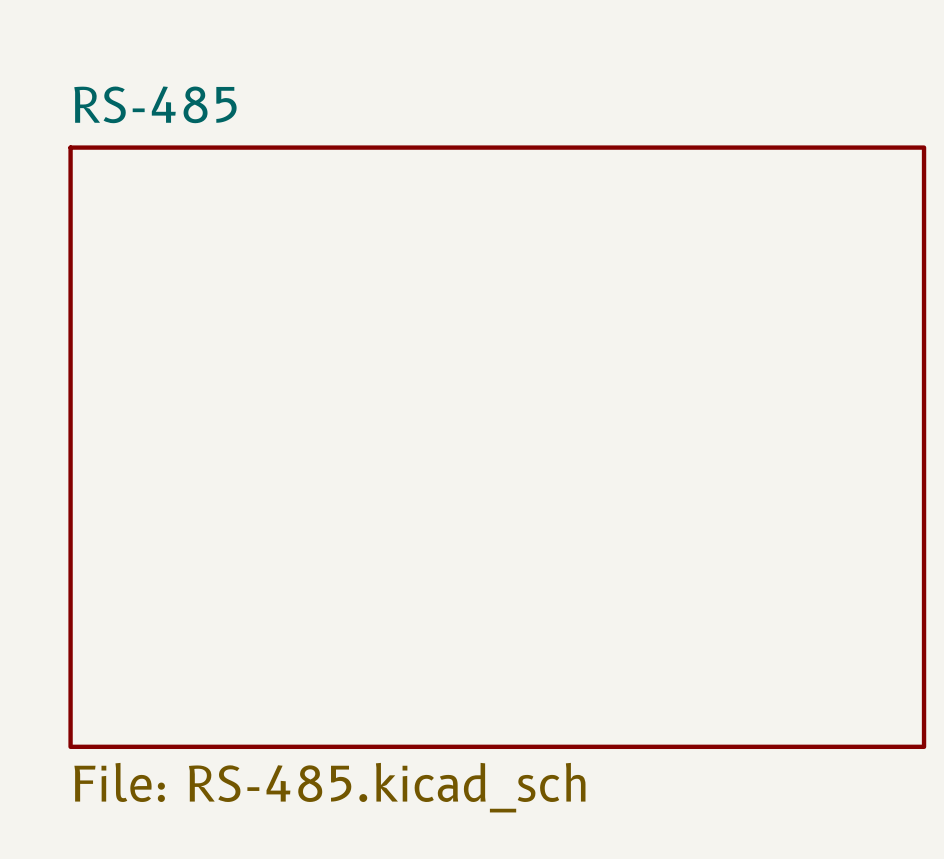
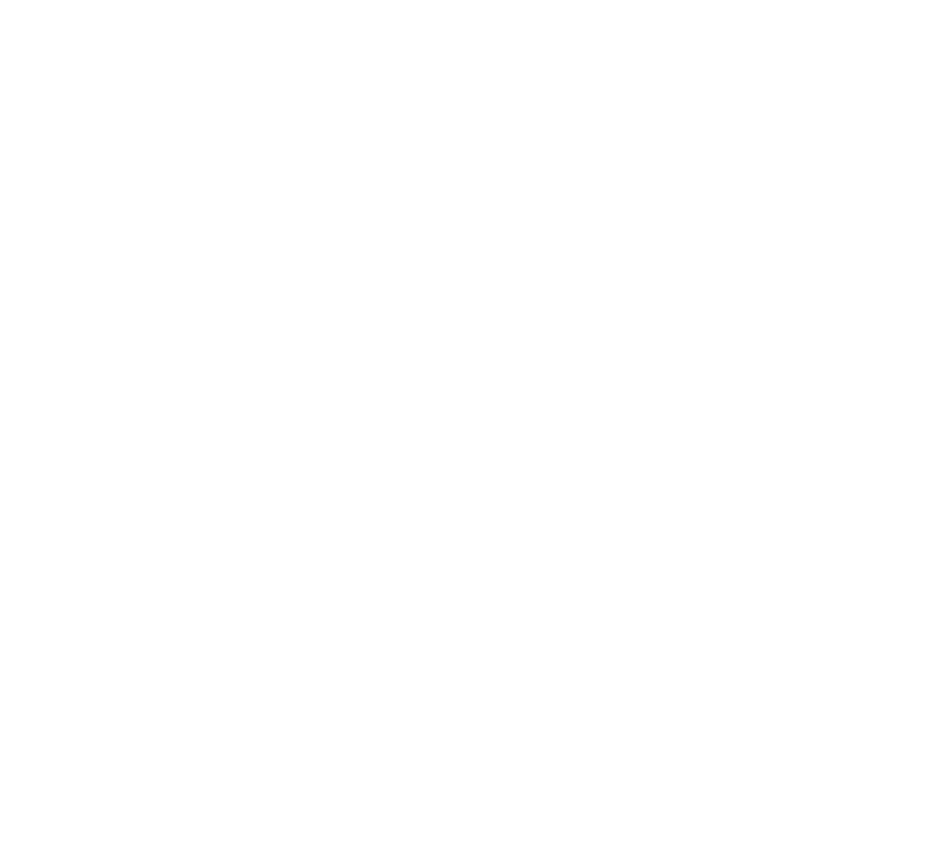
sheet RS-485: File: RS-485.kicad_sch (497, 447) -> none

